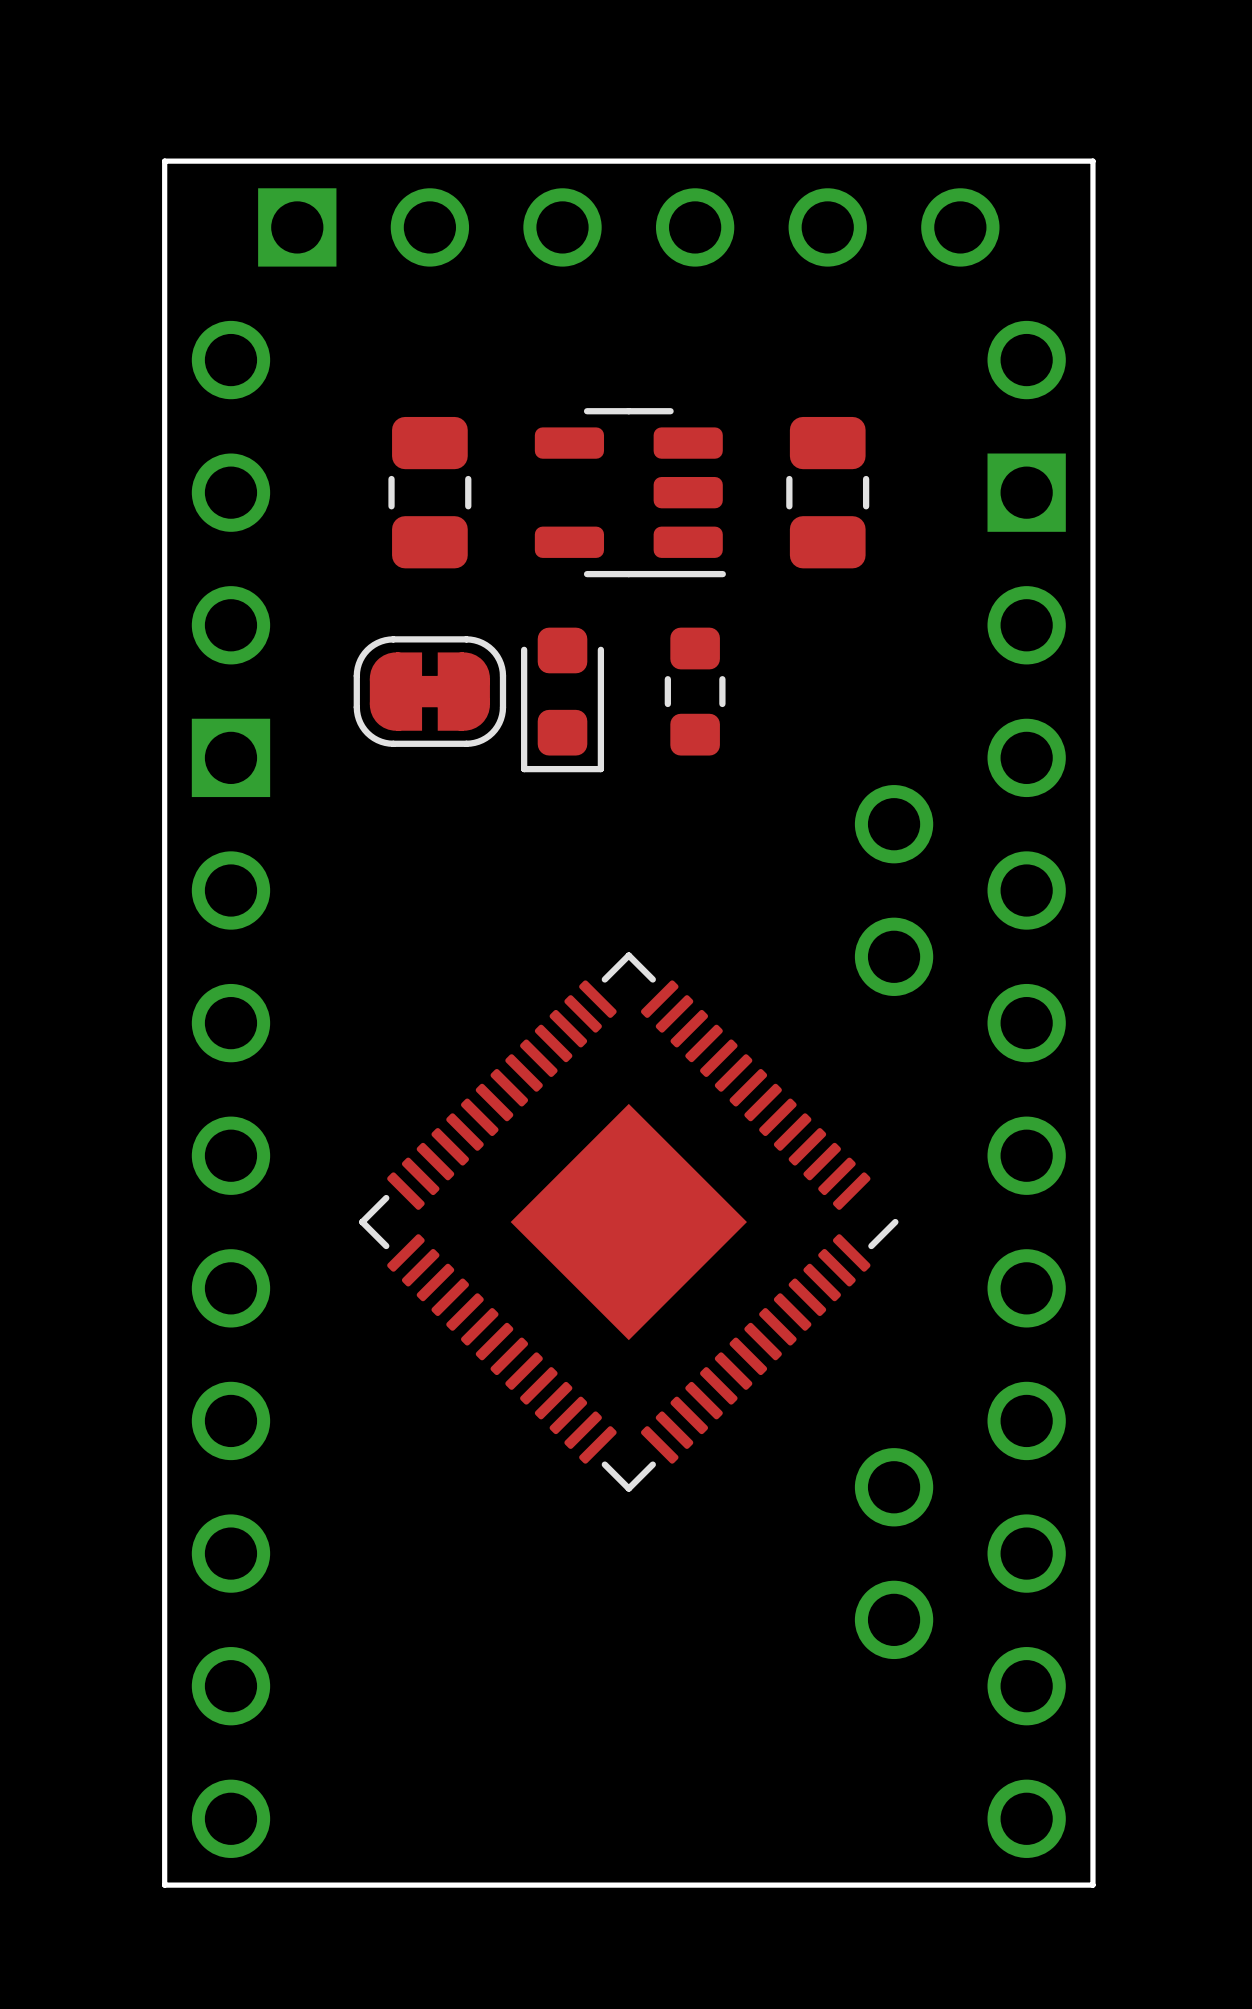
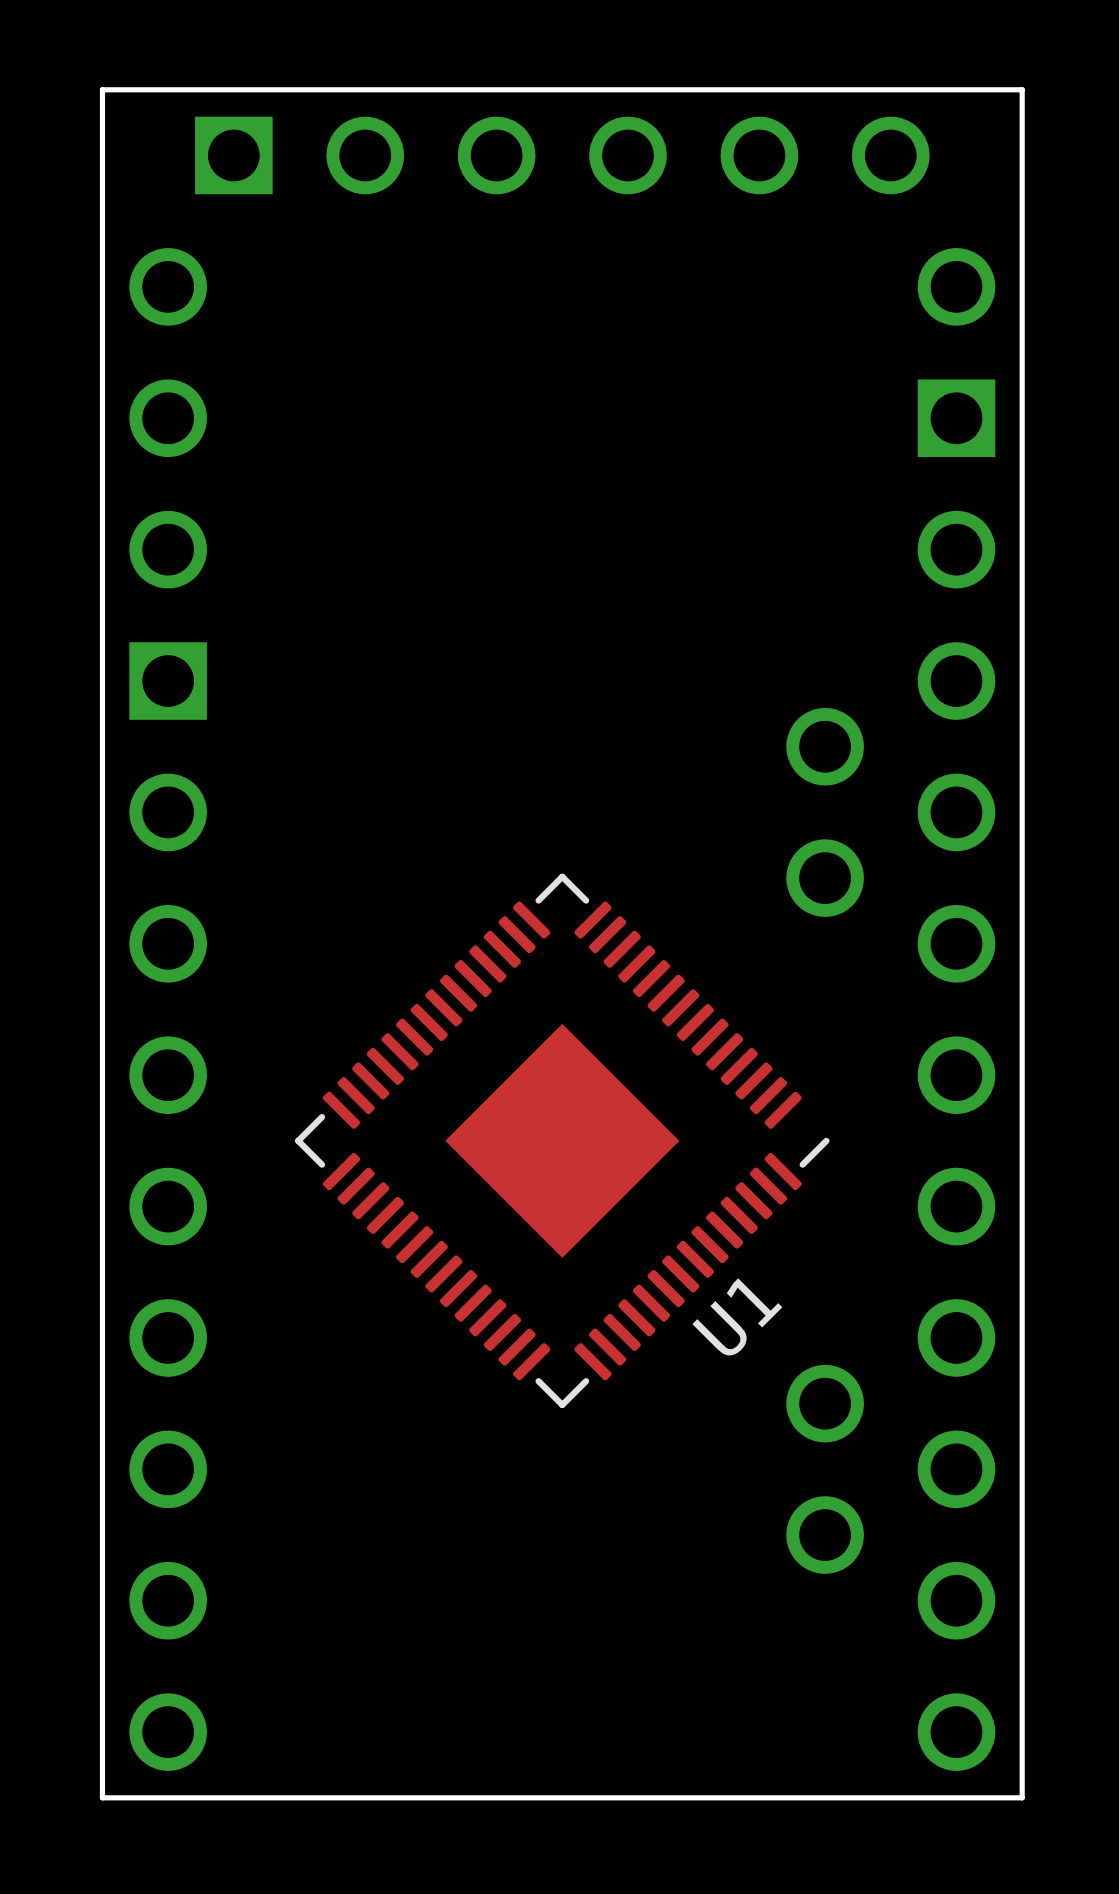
part: (429, 492) -> none
part: (630, 492) -> none
part: (827, 492) -> none
part: (429, 691) -> none
part: (695, 691) -> none
part: (562, 699) -> none
U1 name: none -> U1 (737, 1316)

